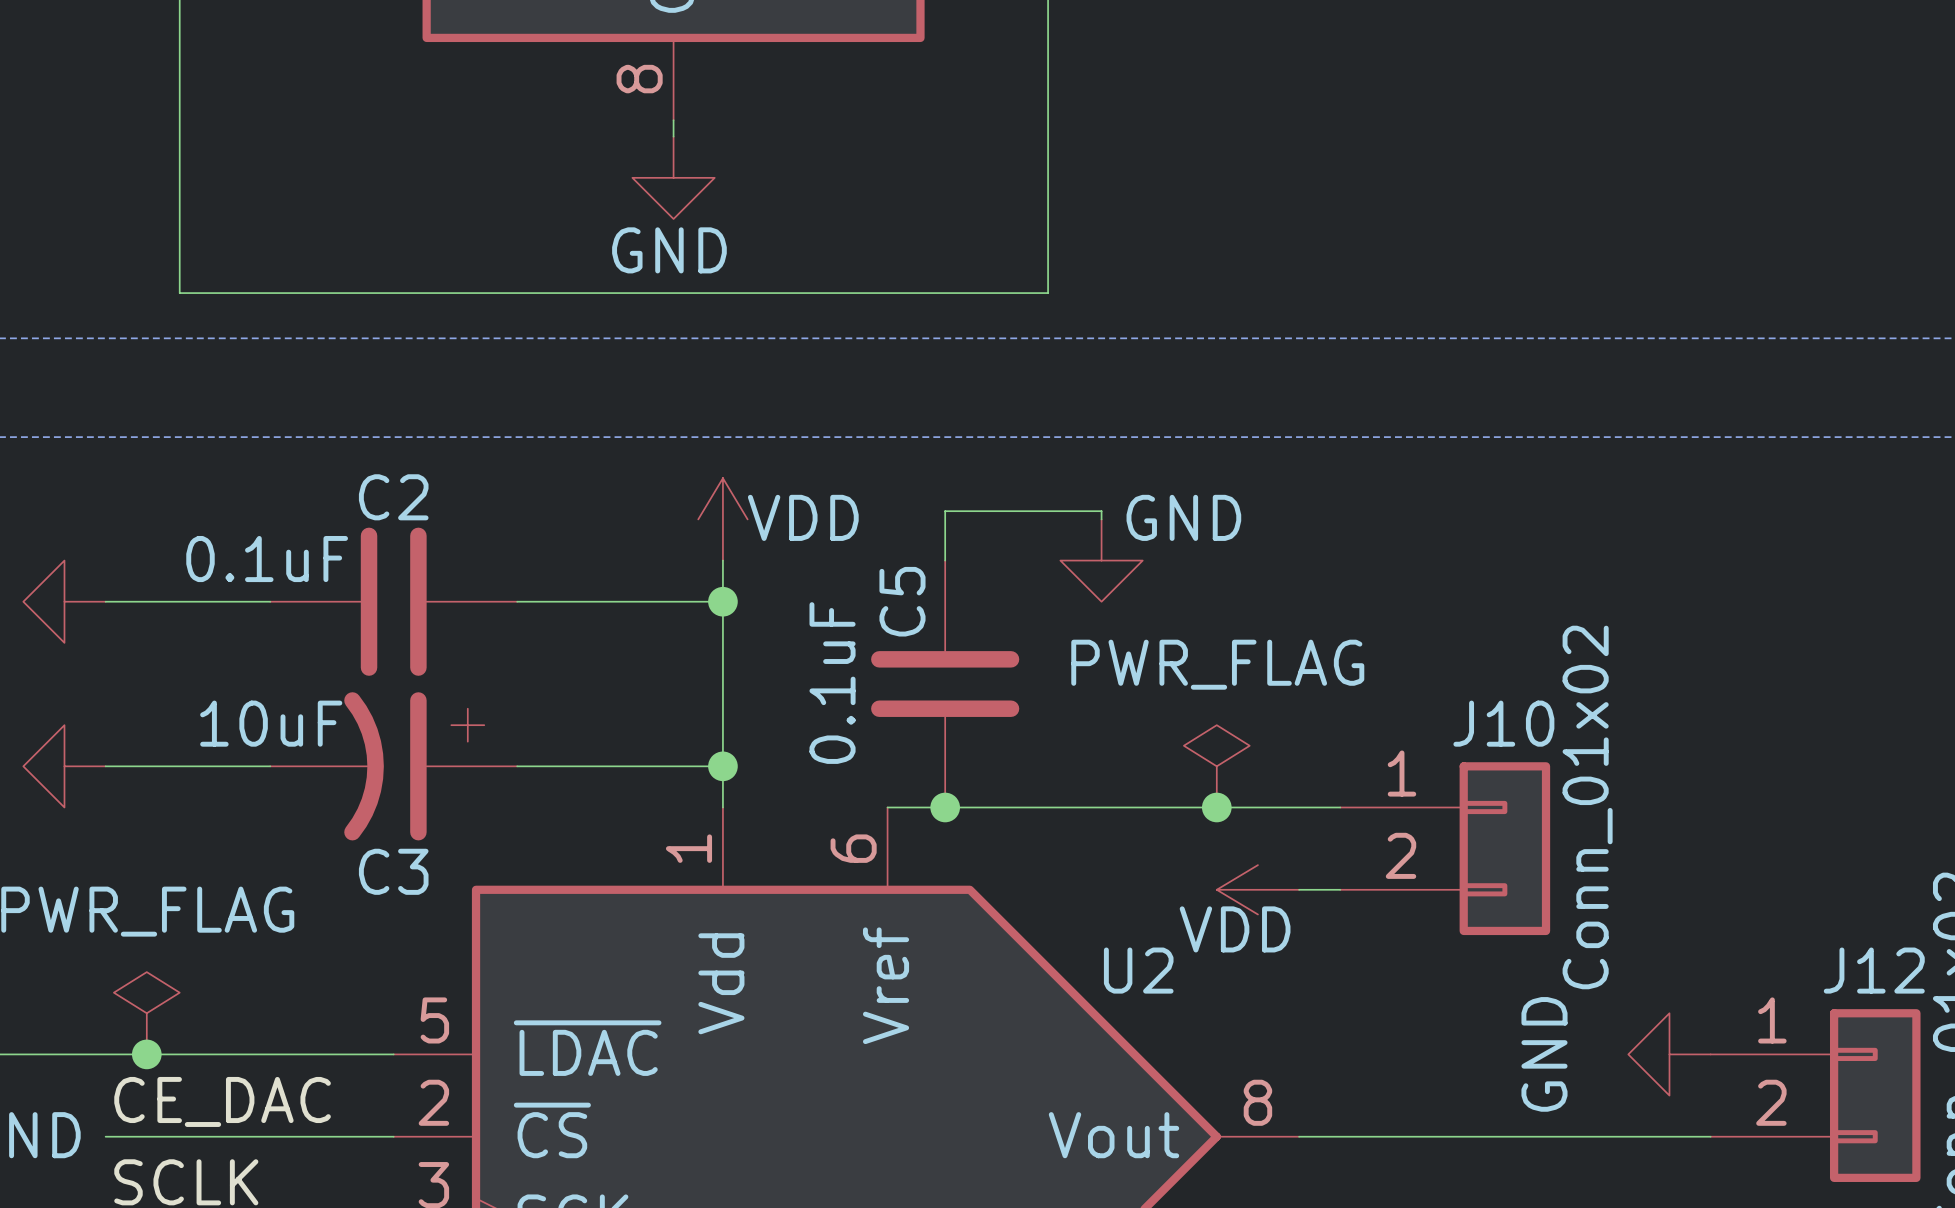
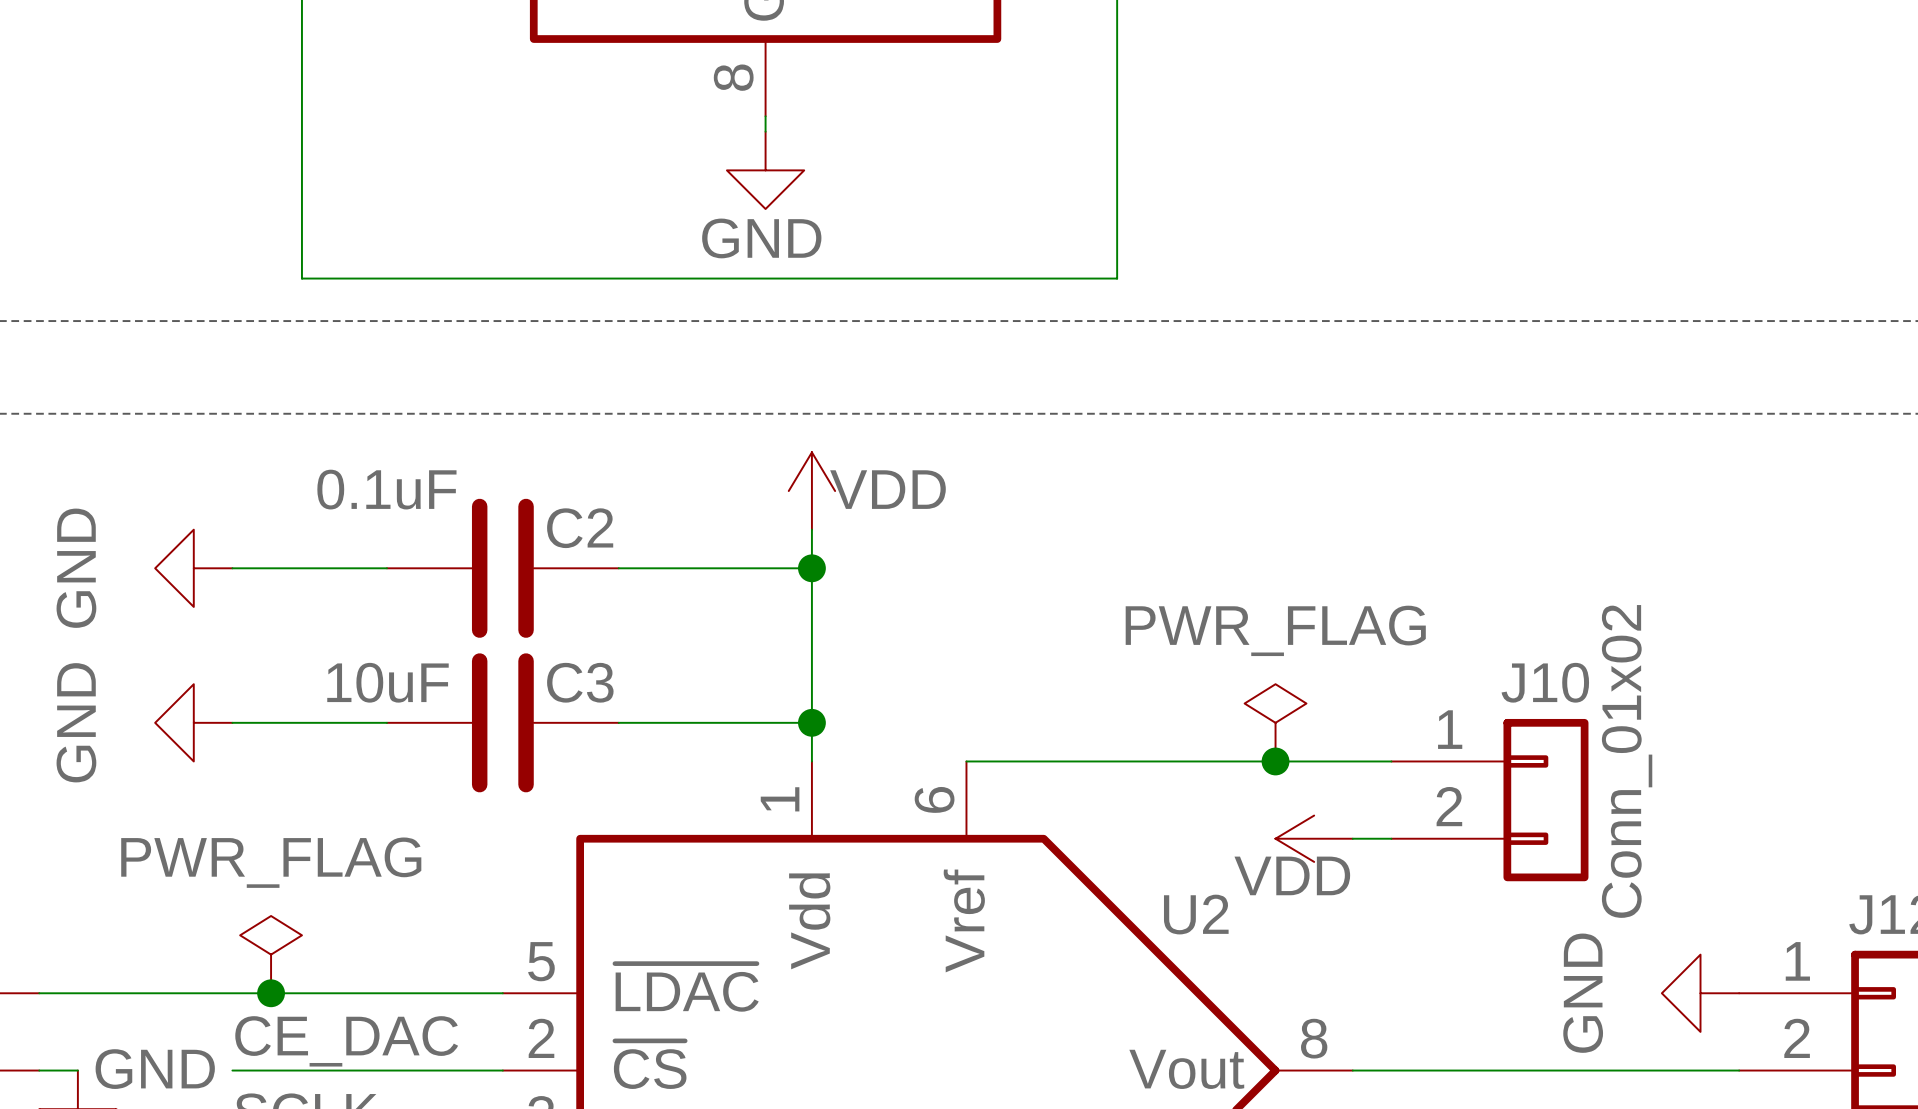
C2 name position: C2 (393, 497) -> C2 (580, 528)
wire: (1101, 519) (1101, 511) (945, 511) (945, 560) -> none
C2 value position: 0.1uF (267, 559) -> 0.1uF (386, 489)
power symbol: GND (1101, 560) -> none
C5: 0.1uF (945, 684) -> none
C3 symbol: [270, 692, 518, 841] -> [386, 653, 619, 793]
junction: (945, 807) -> none
C3 name position: C3 (393, 871) -> C3 (580, 682)

